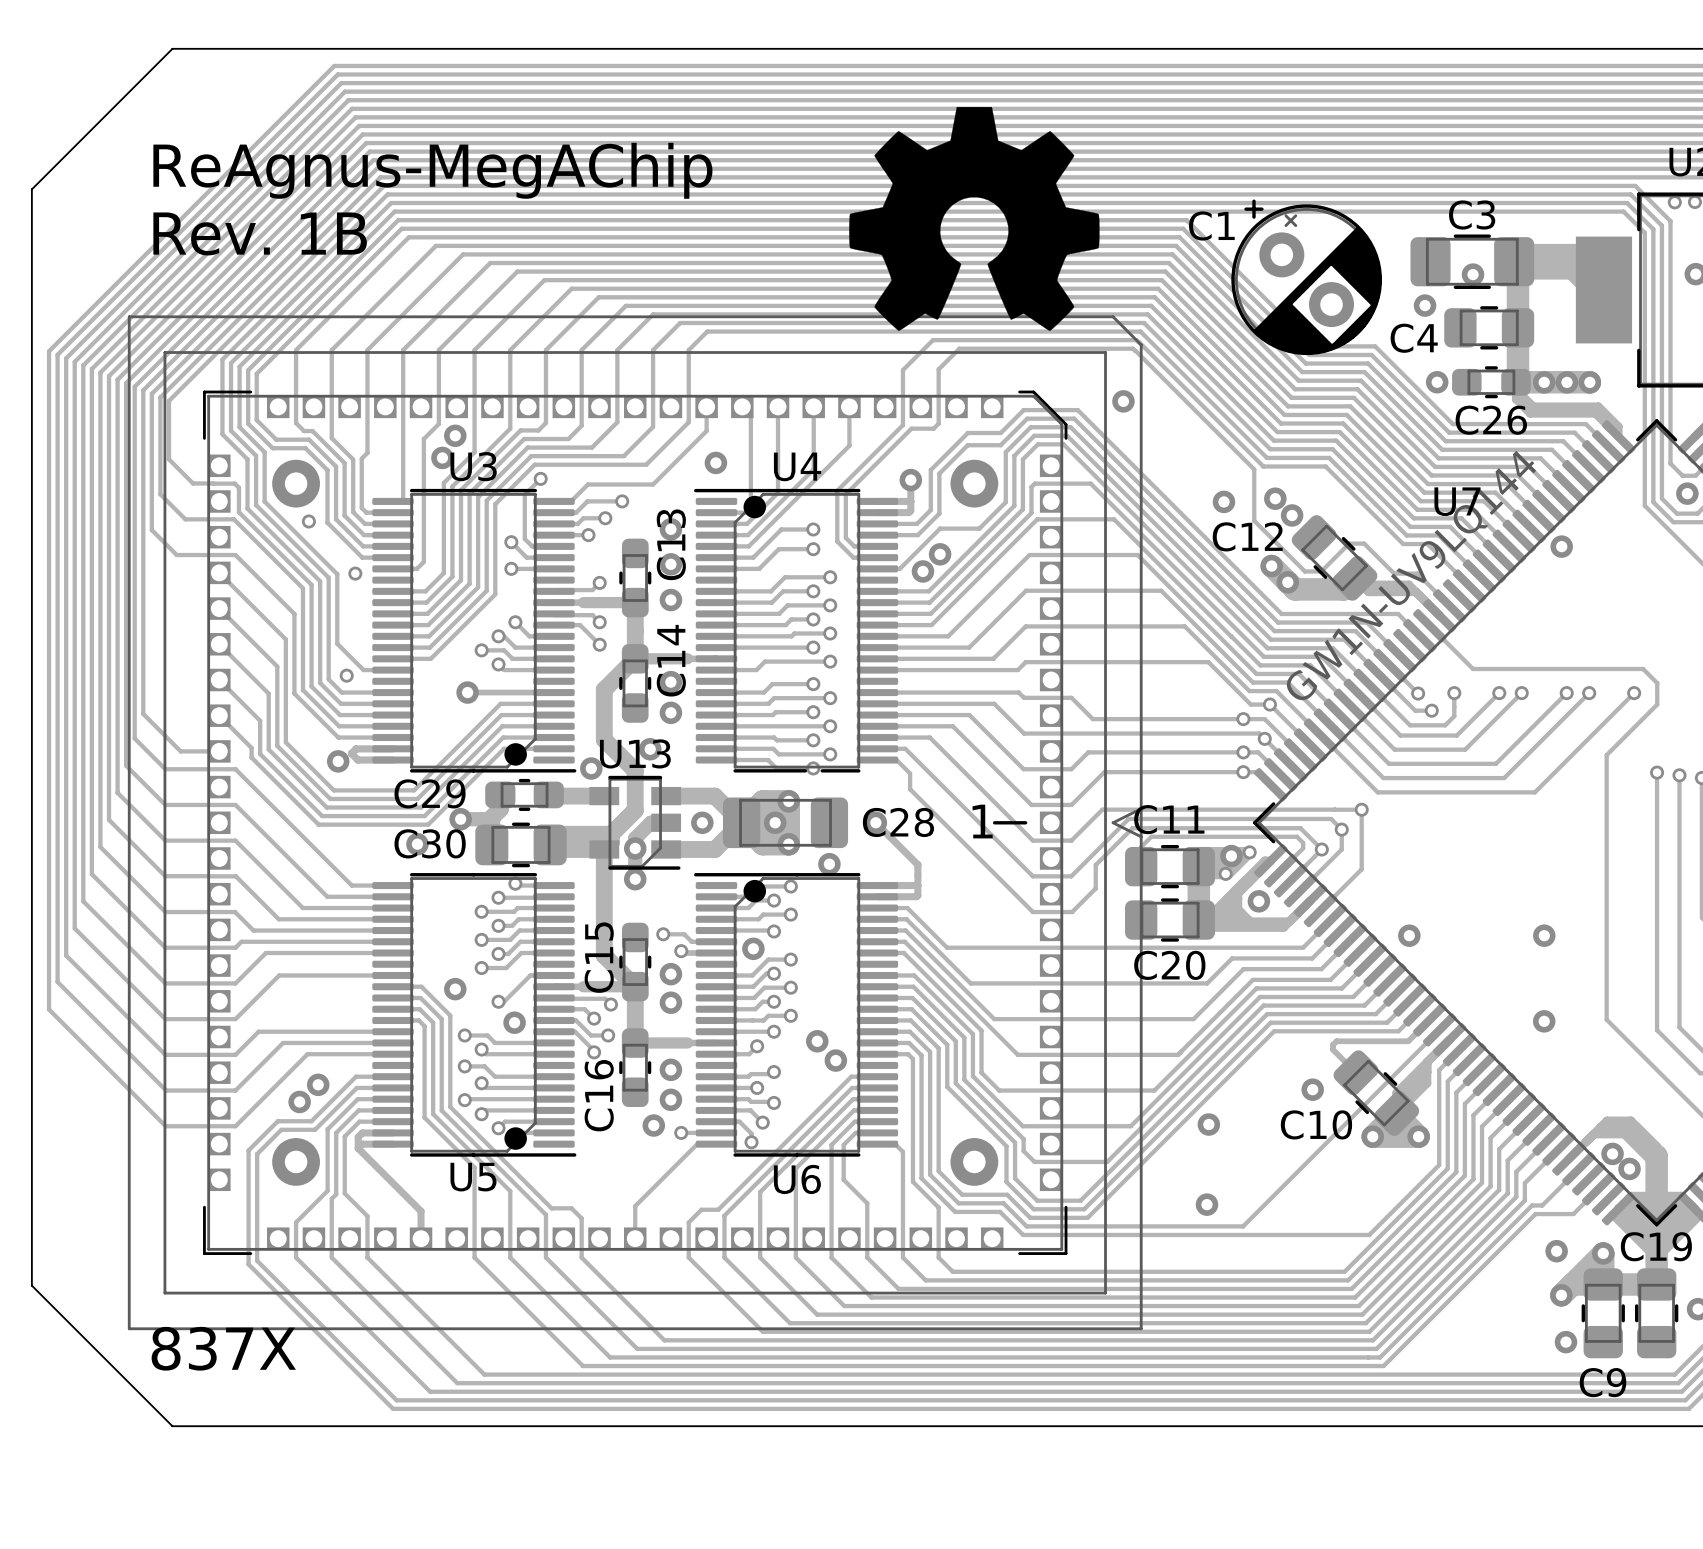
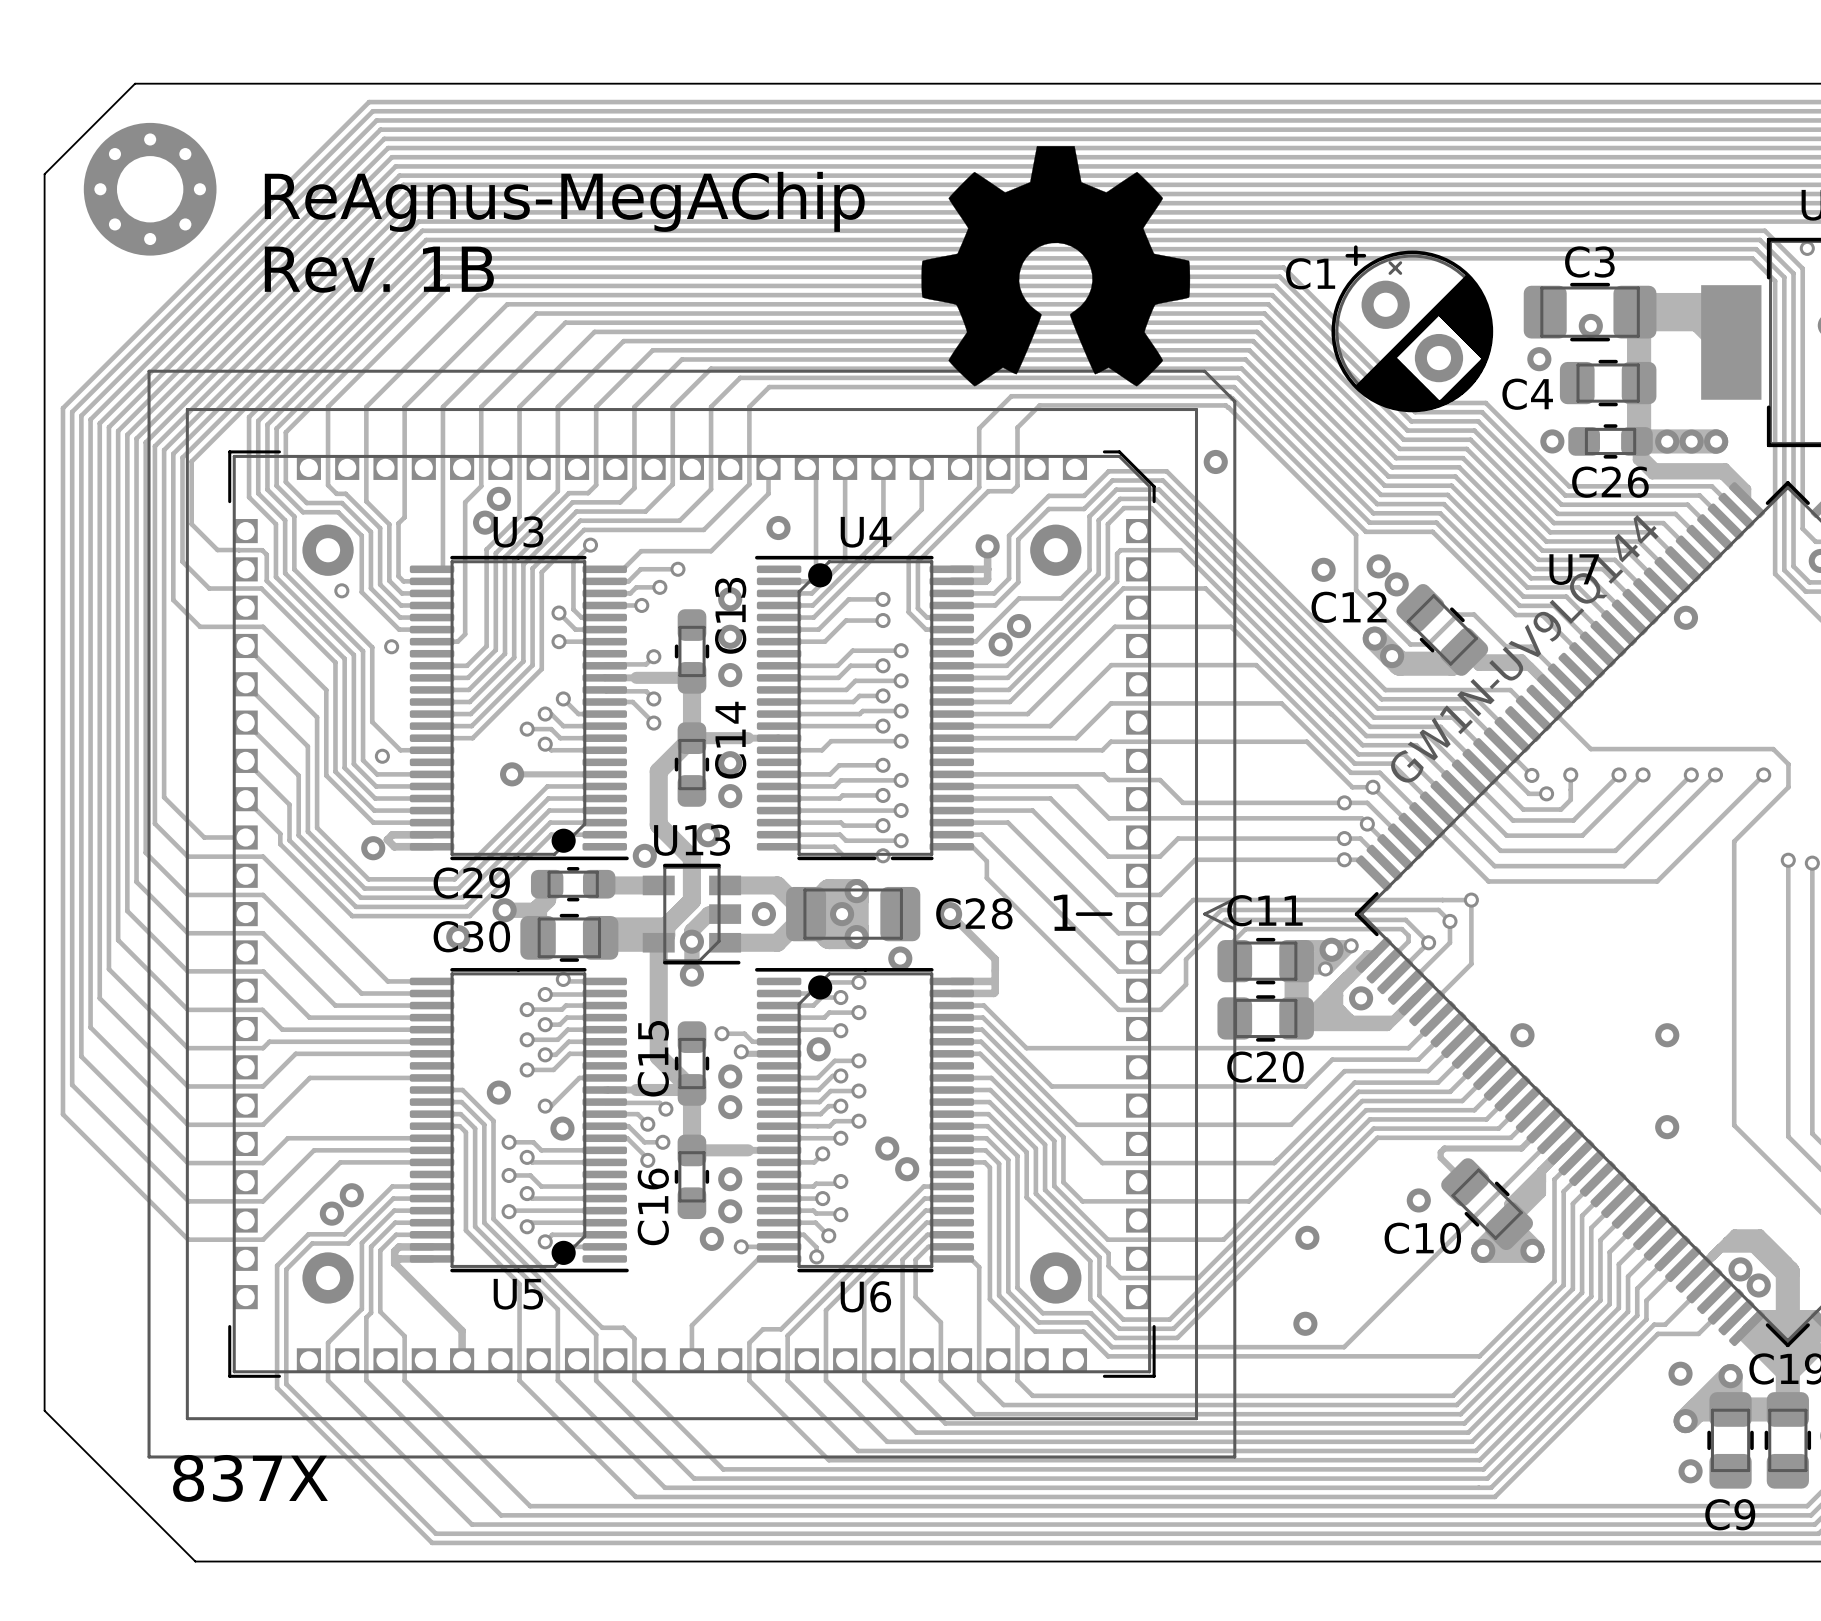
board edge: (172, 48) (31, 189) -> (195, 83) (135, 83) (44, 174) (44, 234)
part: none -> (150, 189)
text position: ReAgnus-MegAChip (432, 170) -> ReAgnus-MegAChip (564, 201)
text position: Rev. 1B (260, 233) -> Rev. 1B (379, 269)

